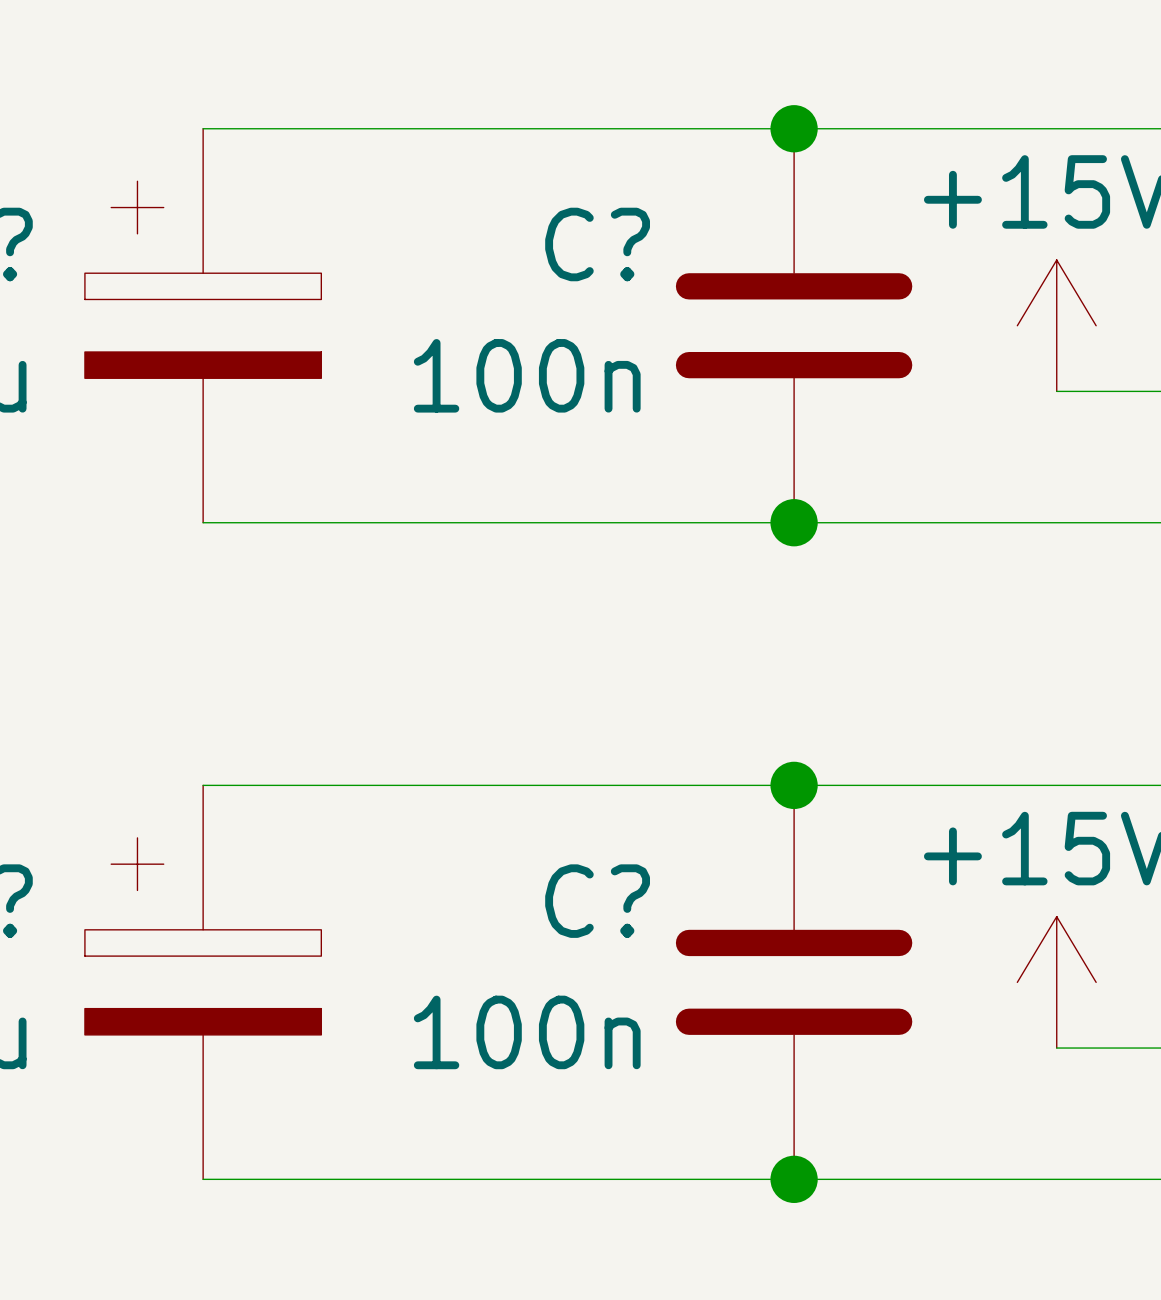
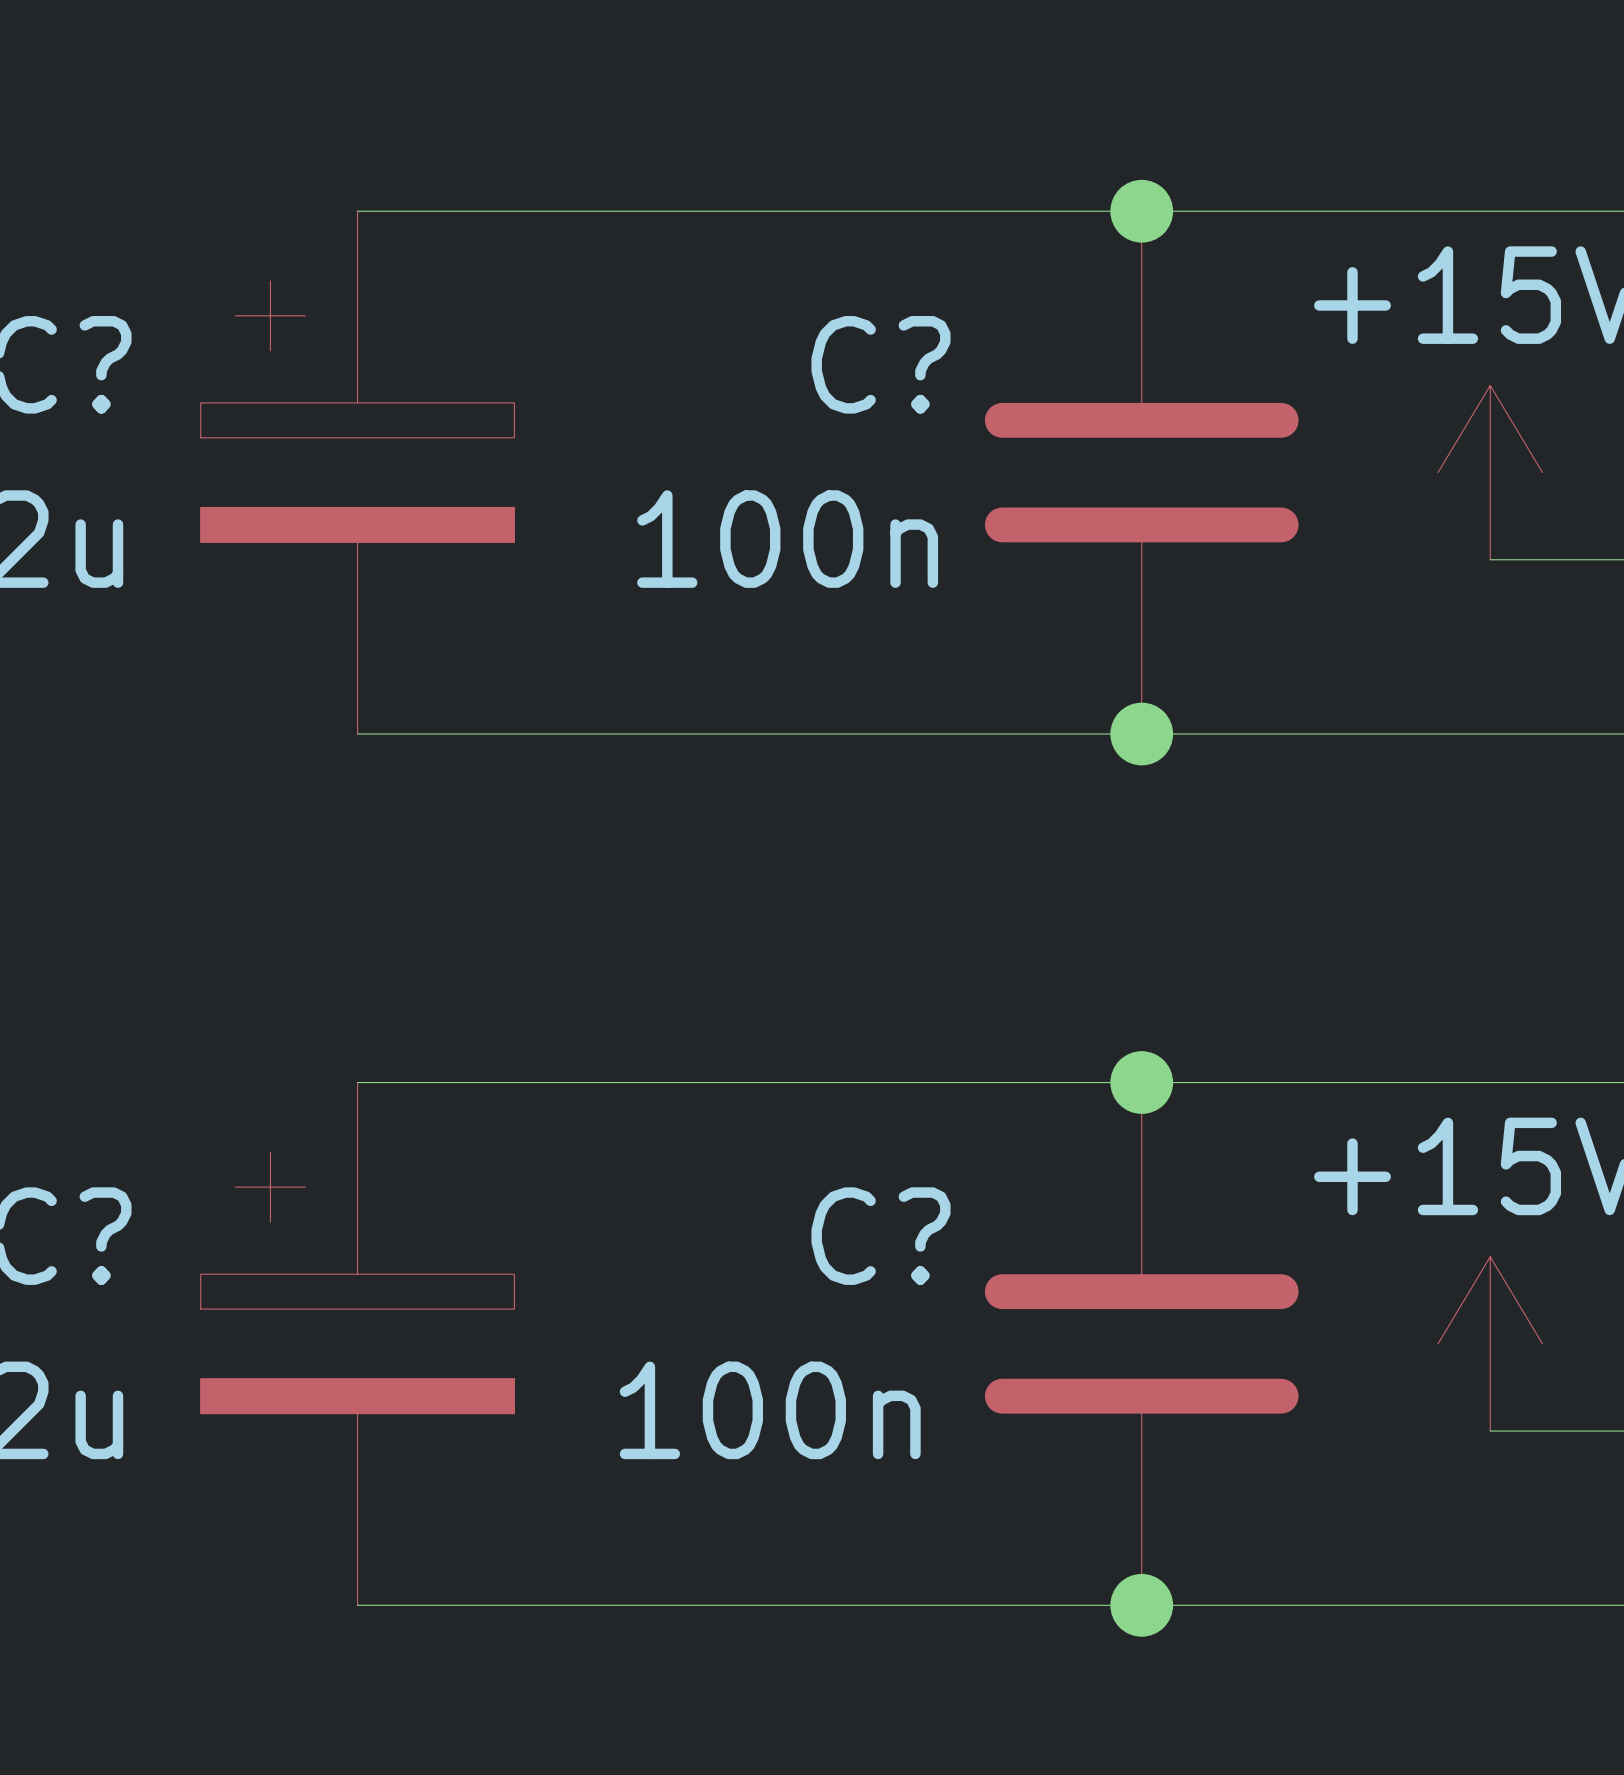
C? value position: 100n (527, 1032) -> 100n (770, 1410)

